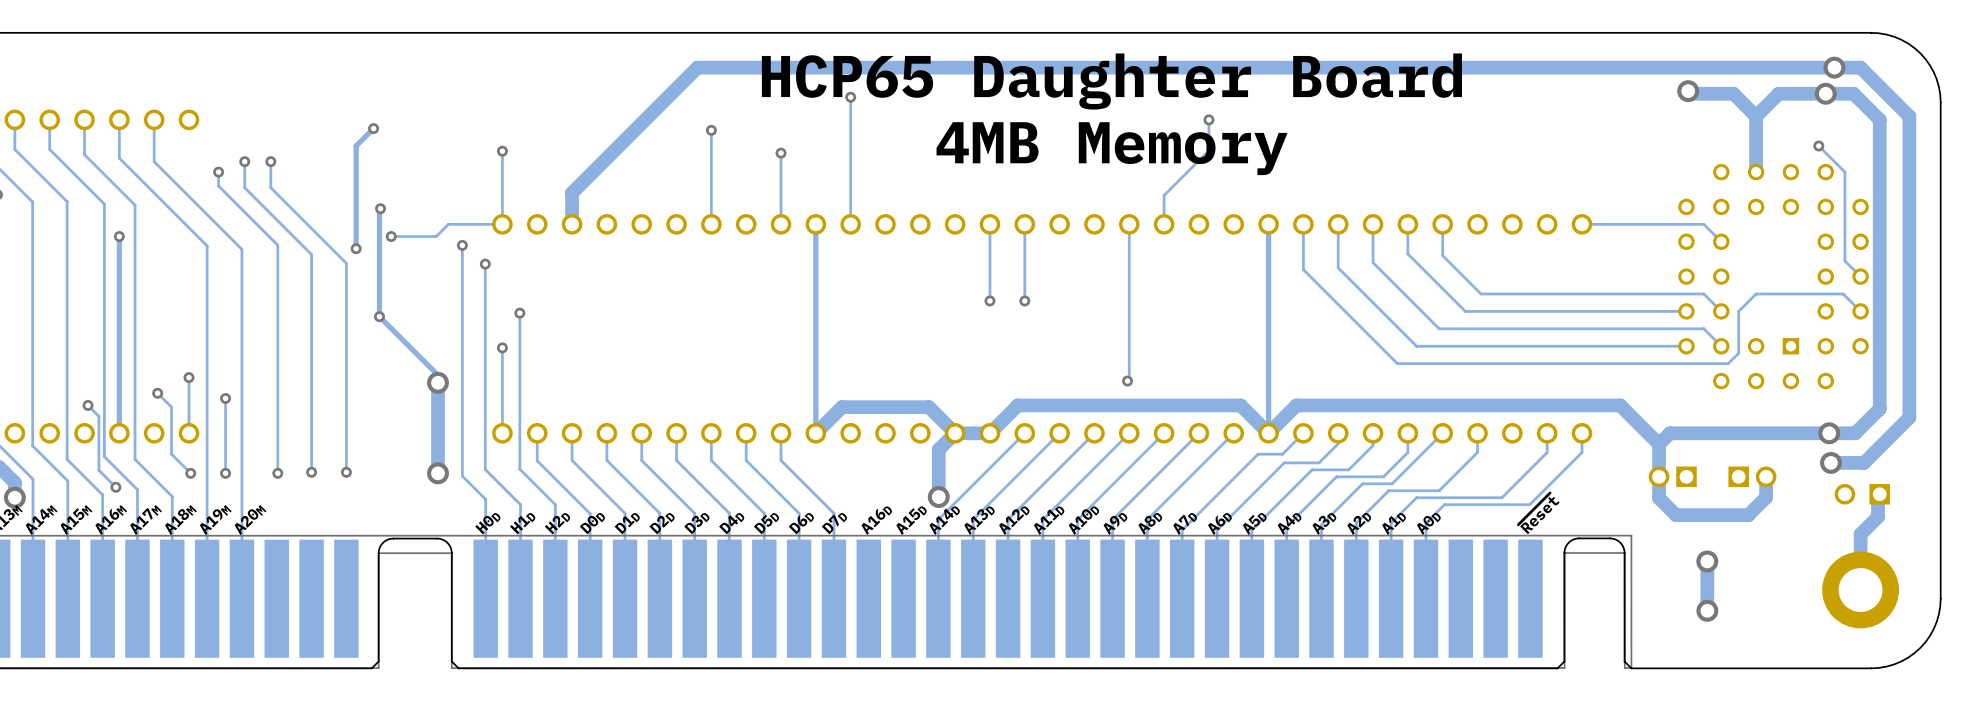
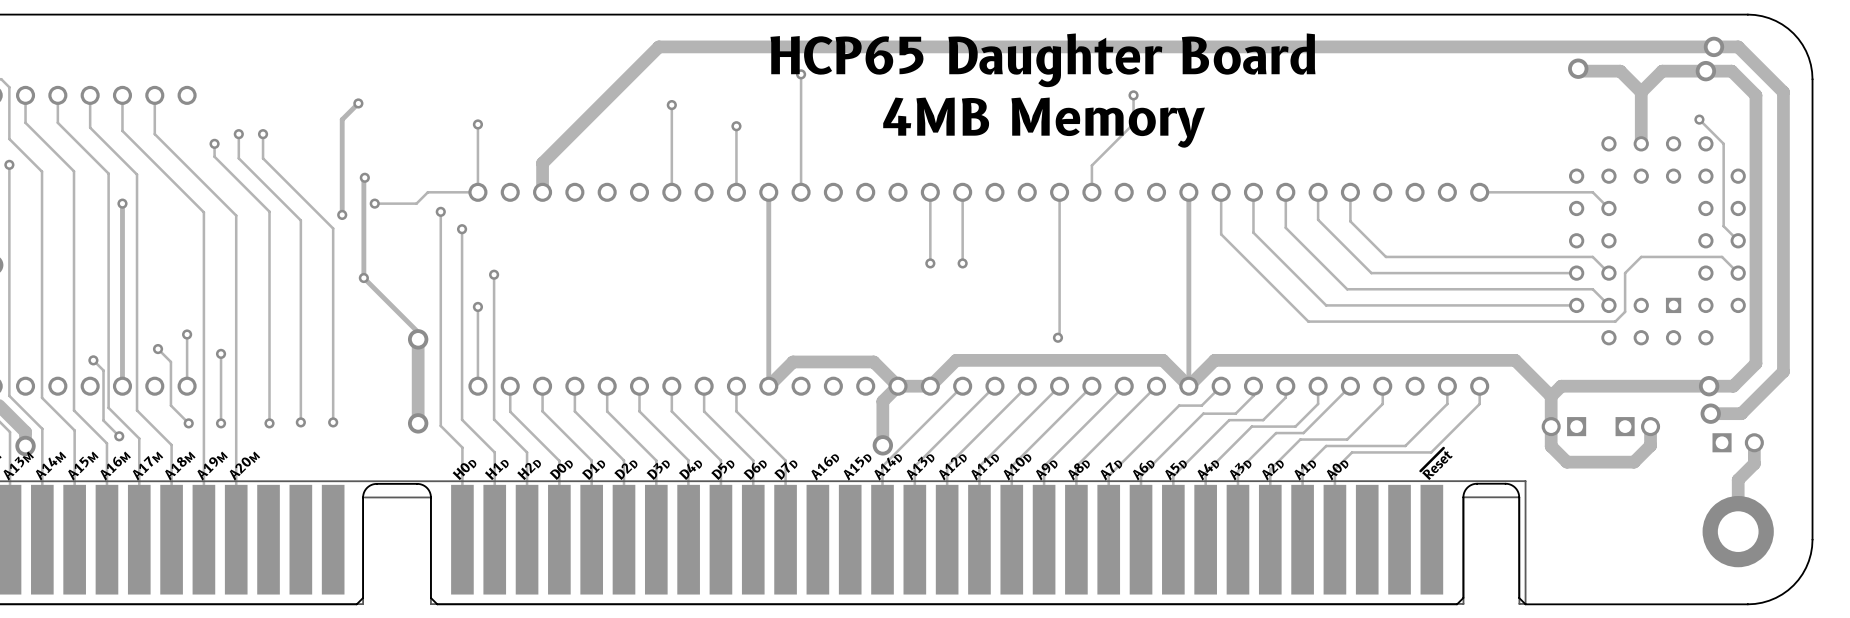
part rotation: 0° (1862, 494) -> 180° (1738, 442)
track: (1707, 561) (1707, 610) -> none
via: (1707, 561) -> none
via: (1707, 610) -> none

